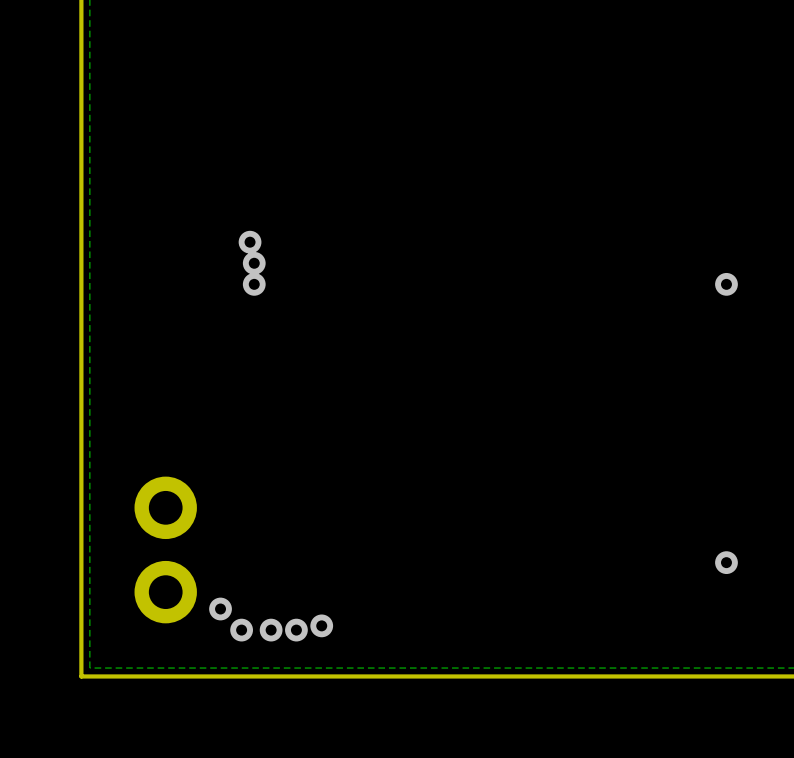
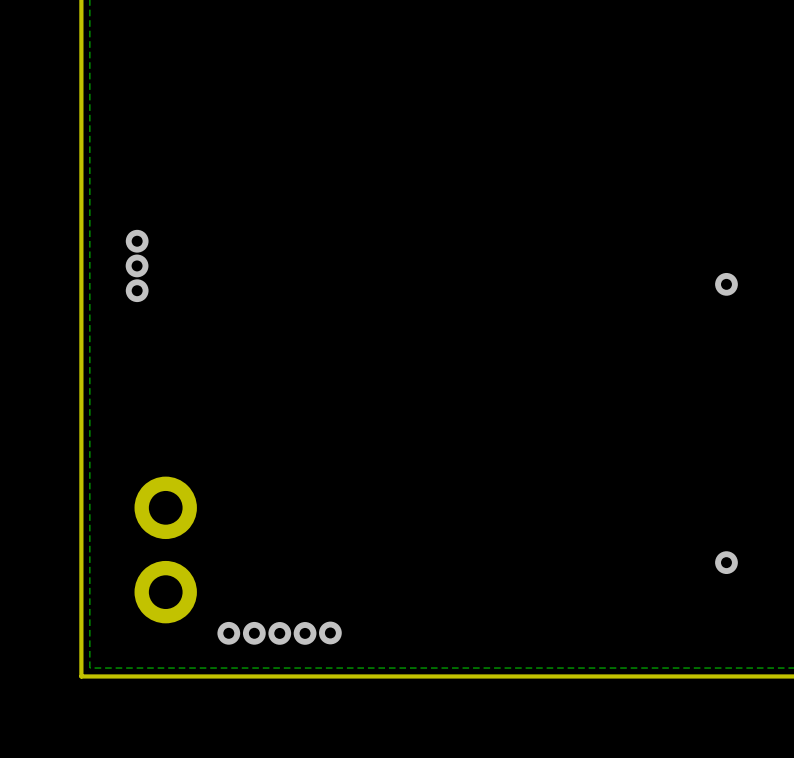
via: none -> (137, 241)
via: (250, 242) -> none
via: (254, 263) -> none
via: none -> (137, 265)
via: (254, 284) -> none
via: none -> (137, 290)
via: (220, 609) -> none
via: (321, 625) -> none
via: (241, 630) -> none
via: (271, 630) -> none
via: (296, 630) -> none
via: none -> (330, 632)
via: none -> (228, 633)
via: none -> (254, 633)
via: none -> (279, 633)
via: none -> (305, 633)

